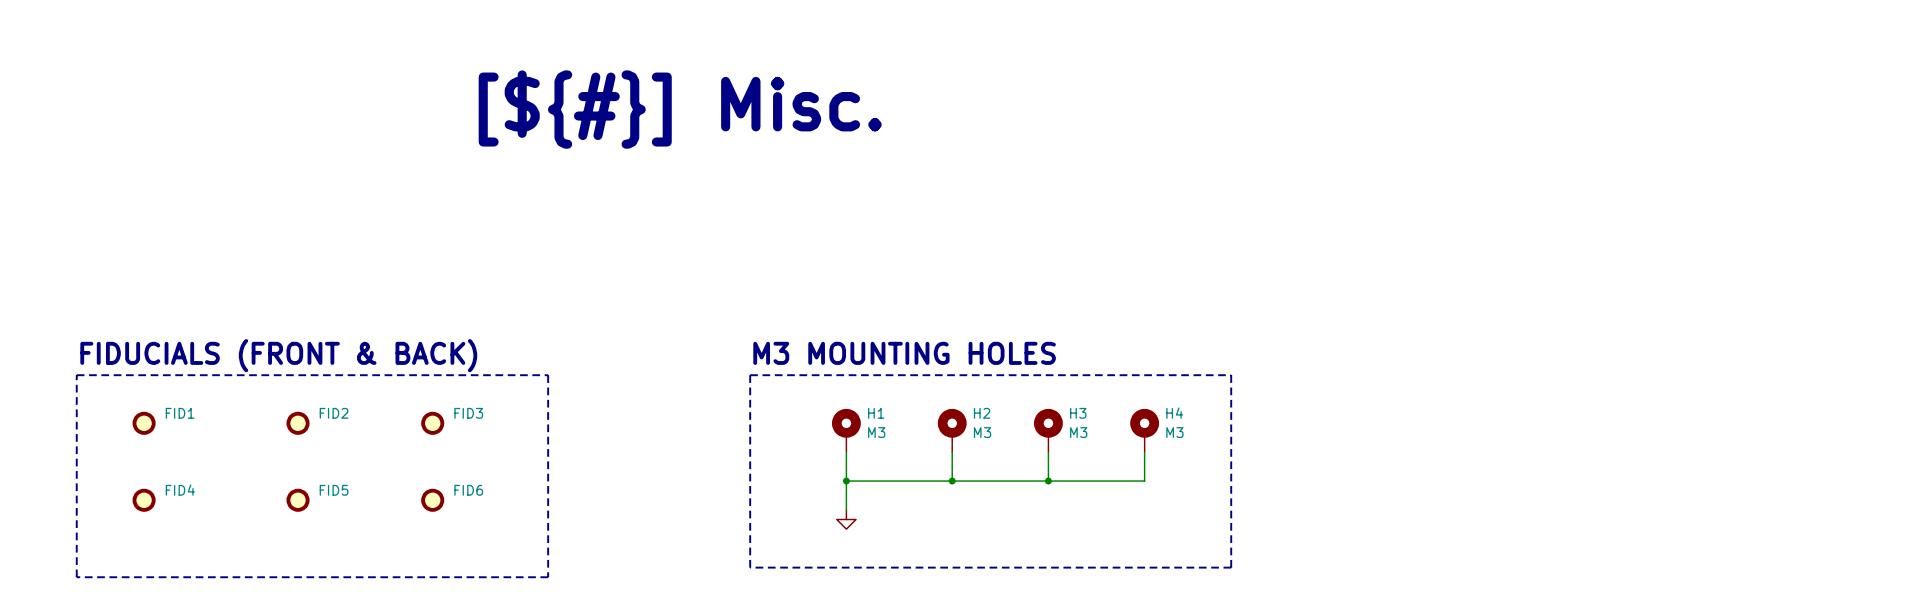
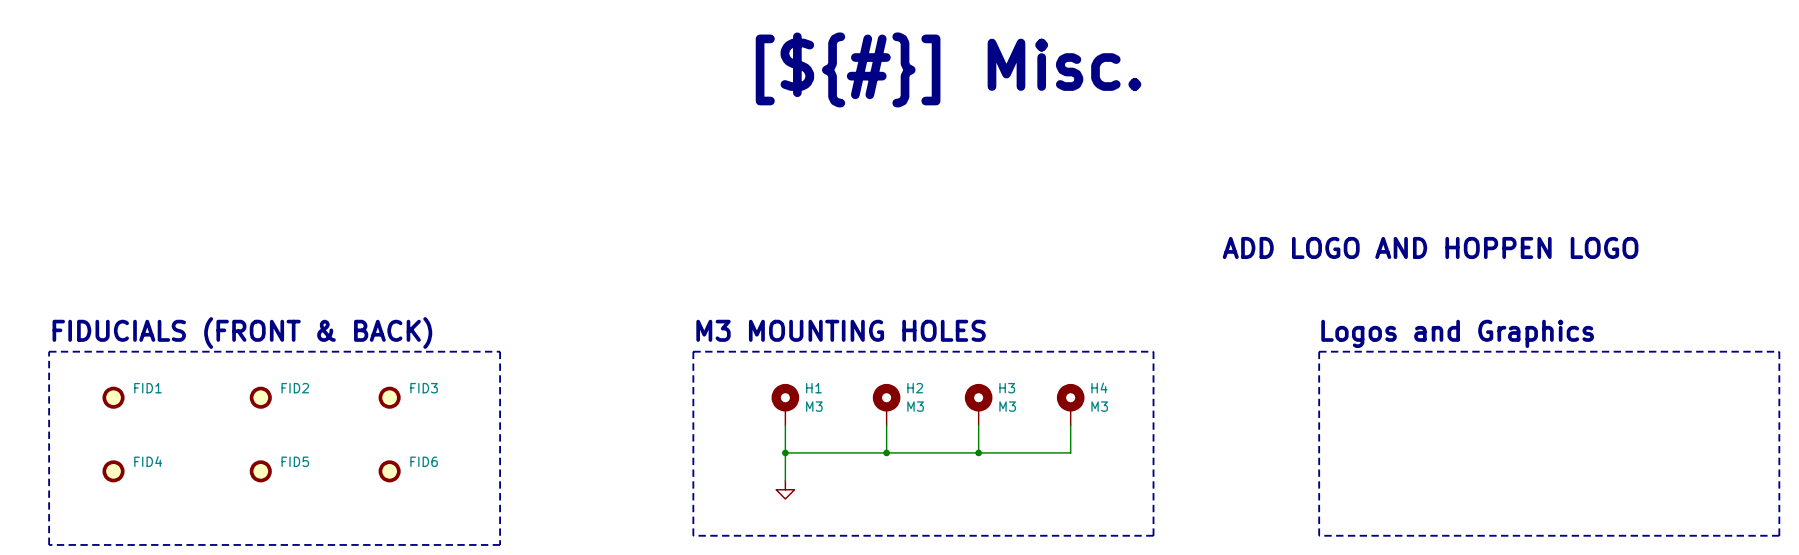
text: none -> [${#}] Misc. (948, 69)
text: [${#}] Misc. (680, 109) -> none
text: none -> ADD LOGO AND HOPPEN LOGO (1430, 247)
text: none -> Logos and Graphics (1457, 333)
line: none -> (1319, 351) (1779, 351) (1779, 535) (1319, 535) (1319, 351)

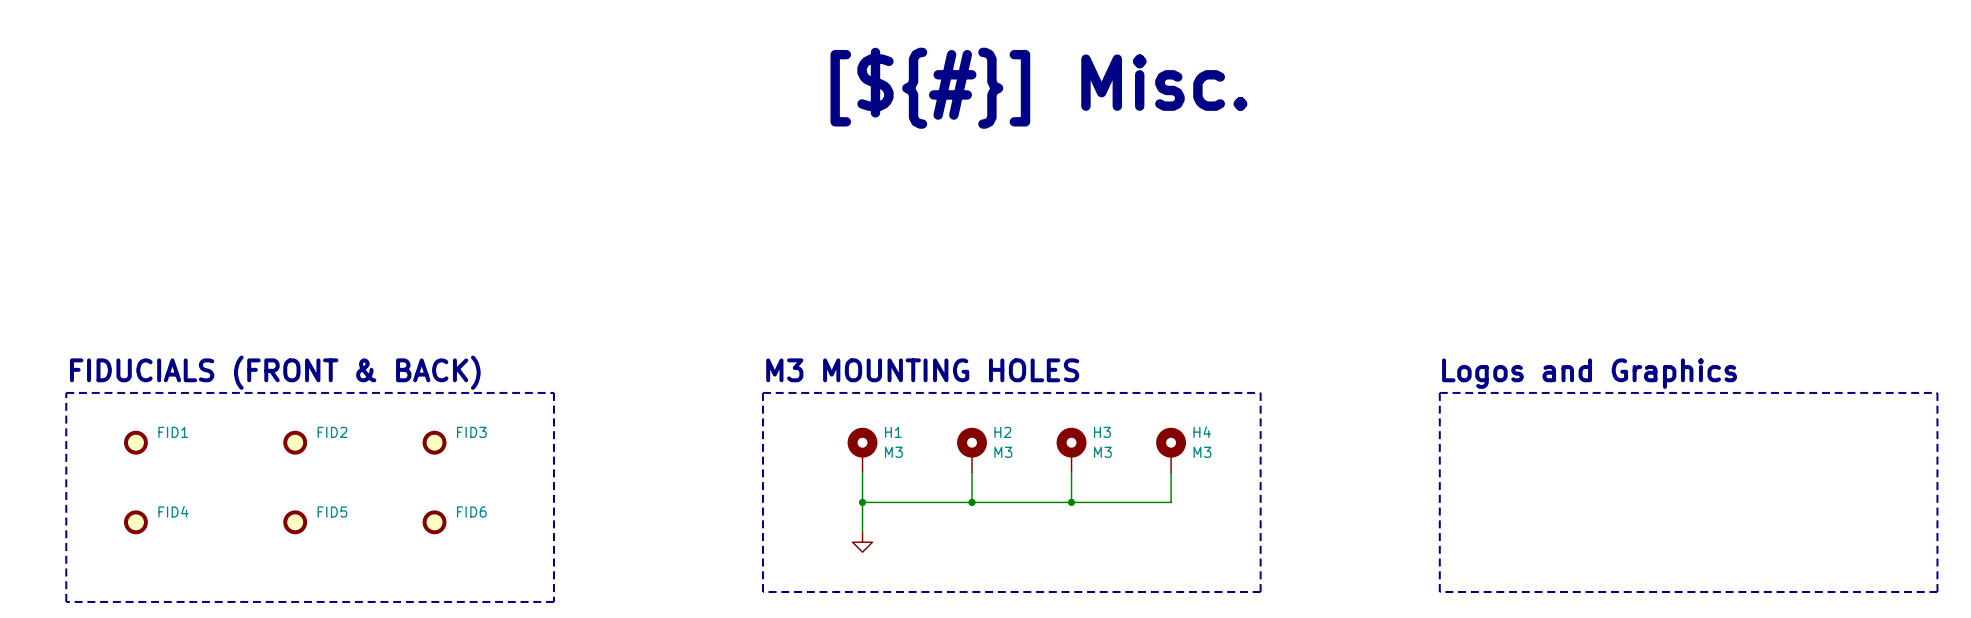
text: ADD LOGO AND HOPPEN LOGO (1430, 247) -> none

